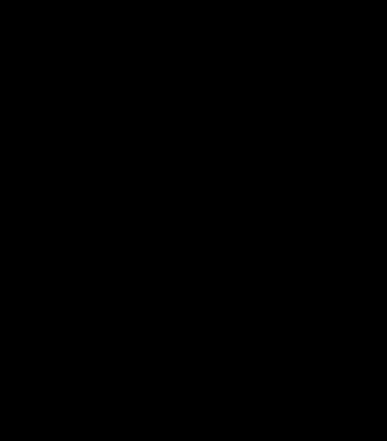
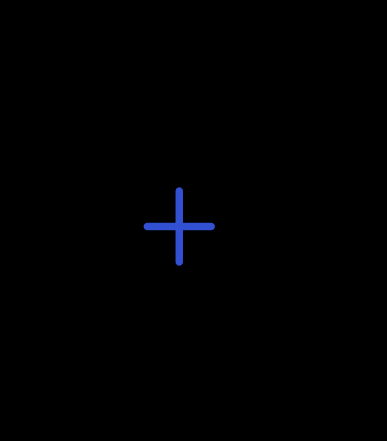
text: none -> + (179, 226)

